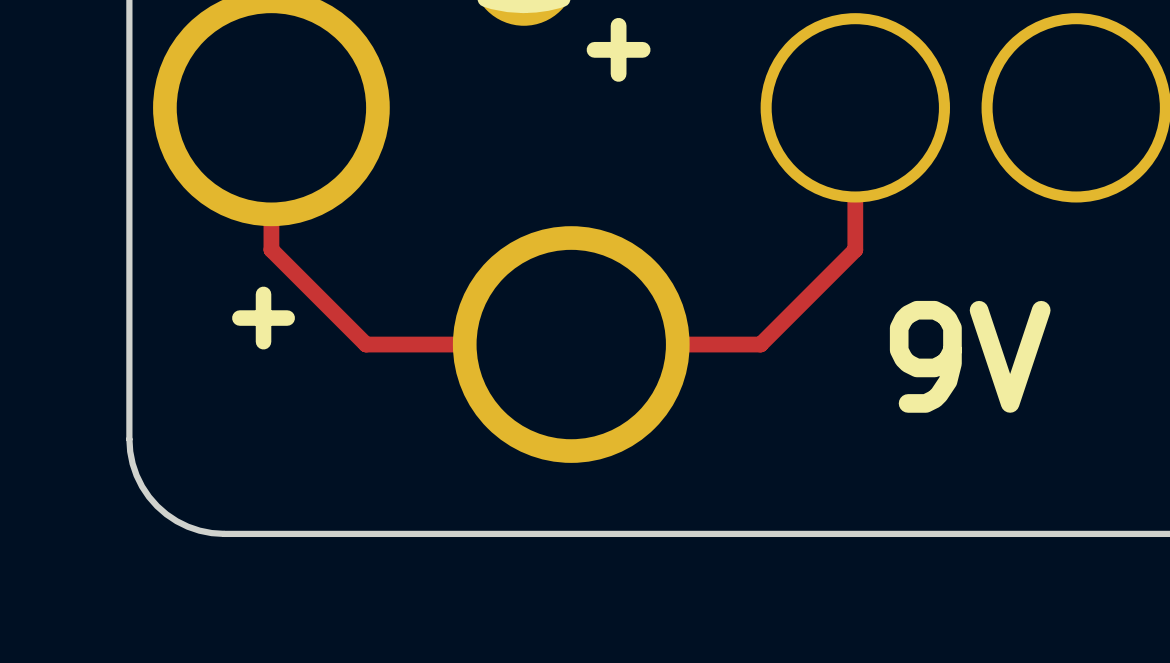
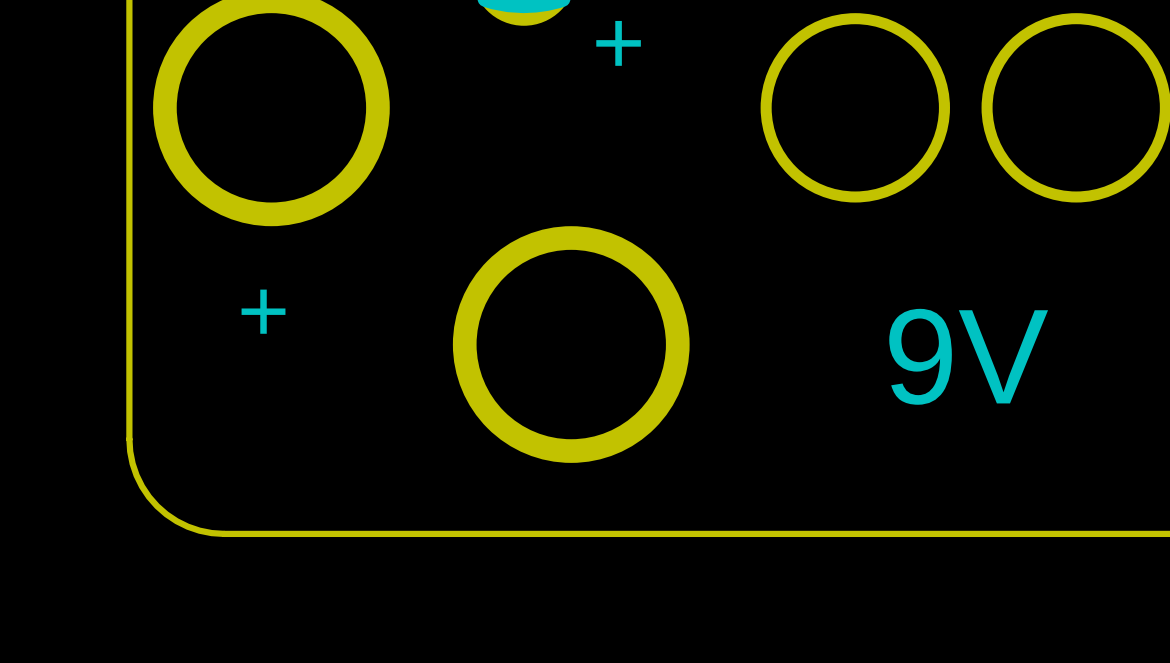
track: (271, 107) (271, 249) (366, 344) (760, 344) (855, 249) (855, 107) -> none

